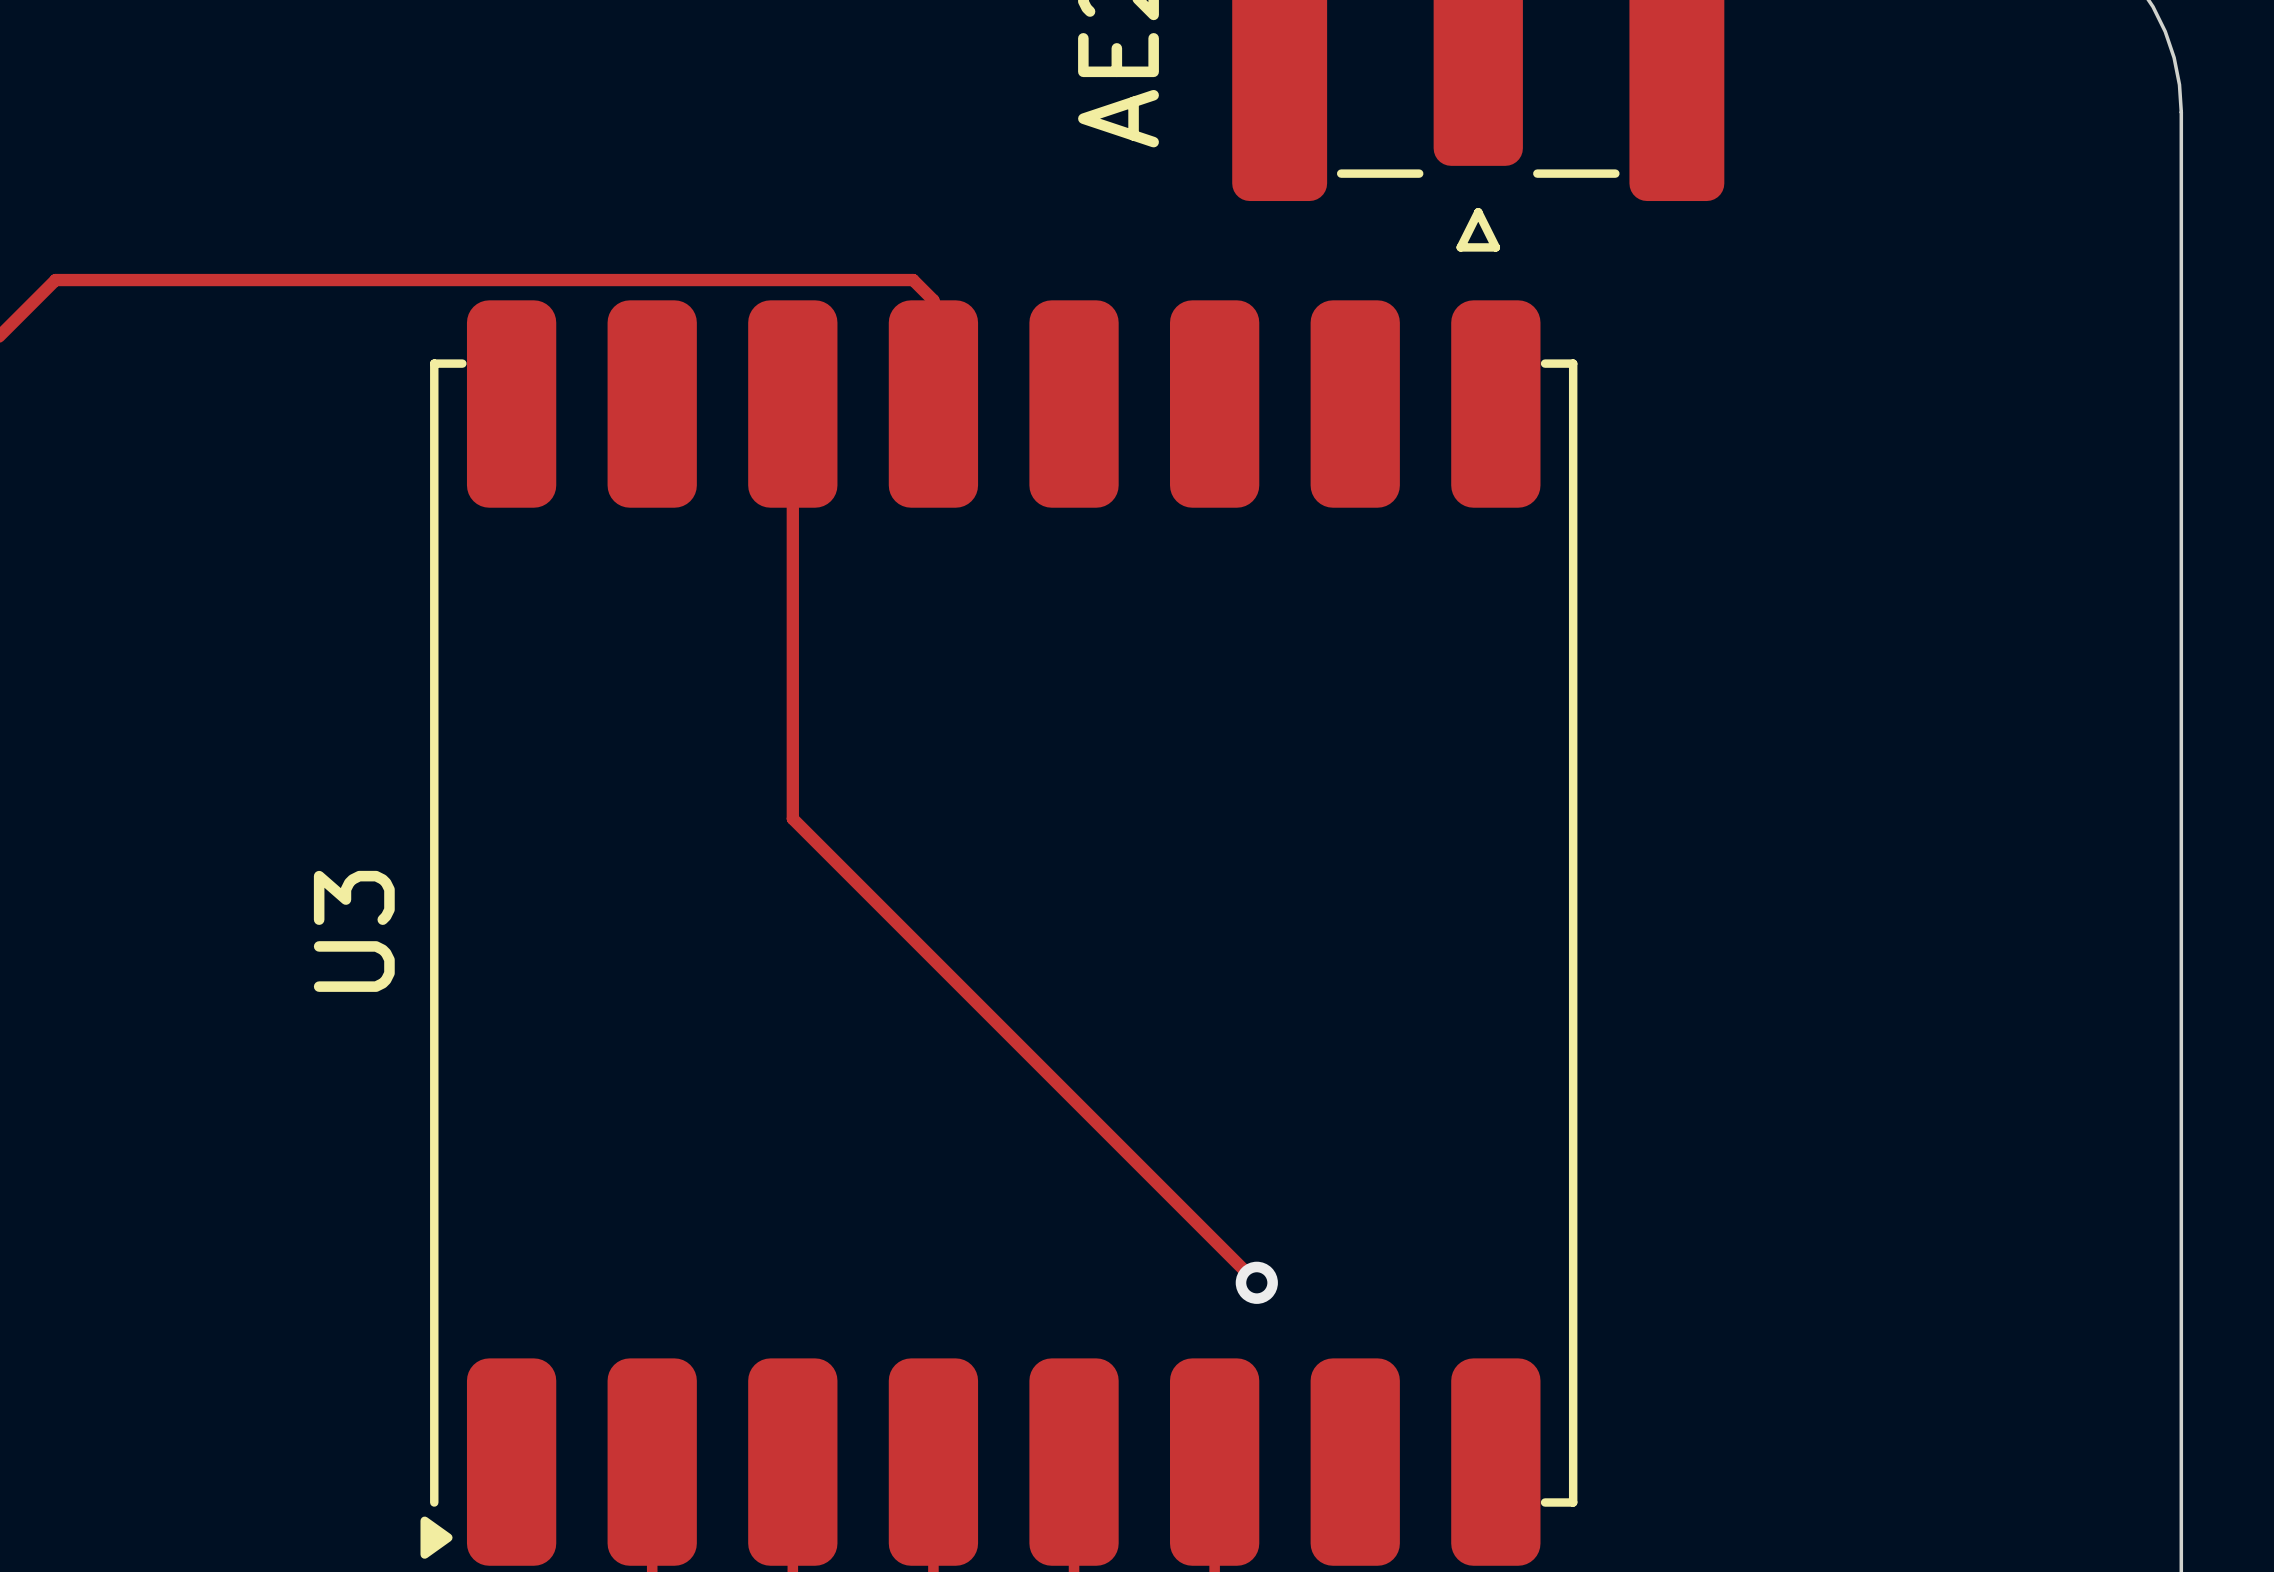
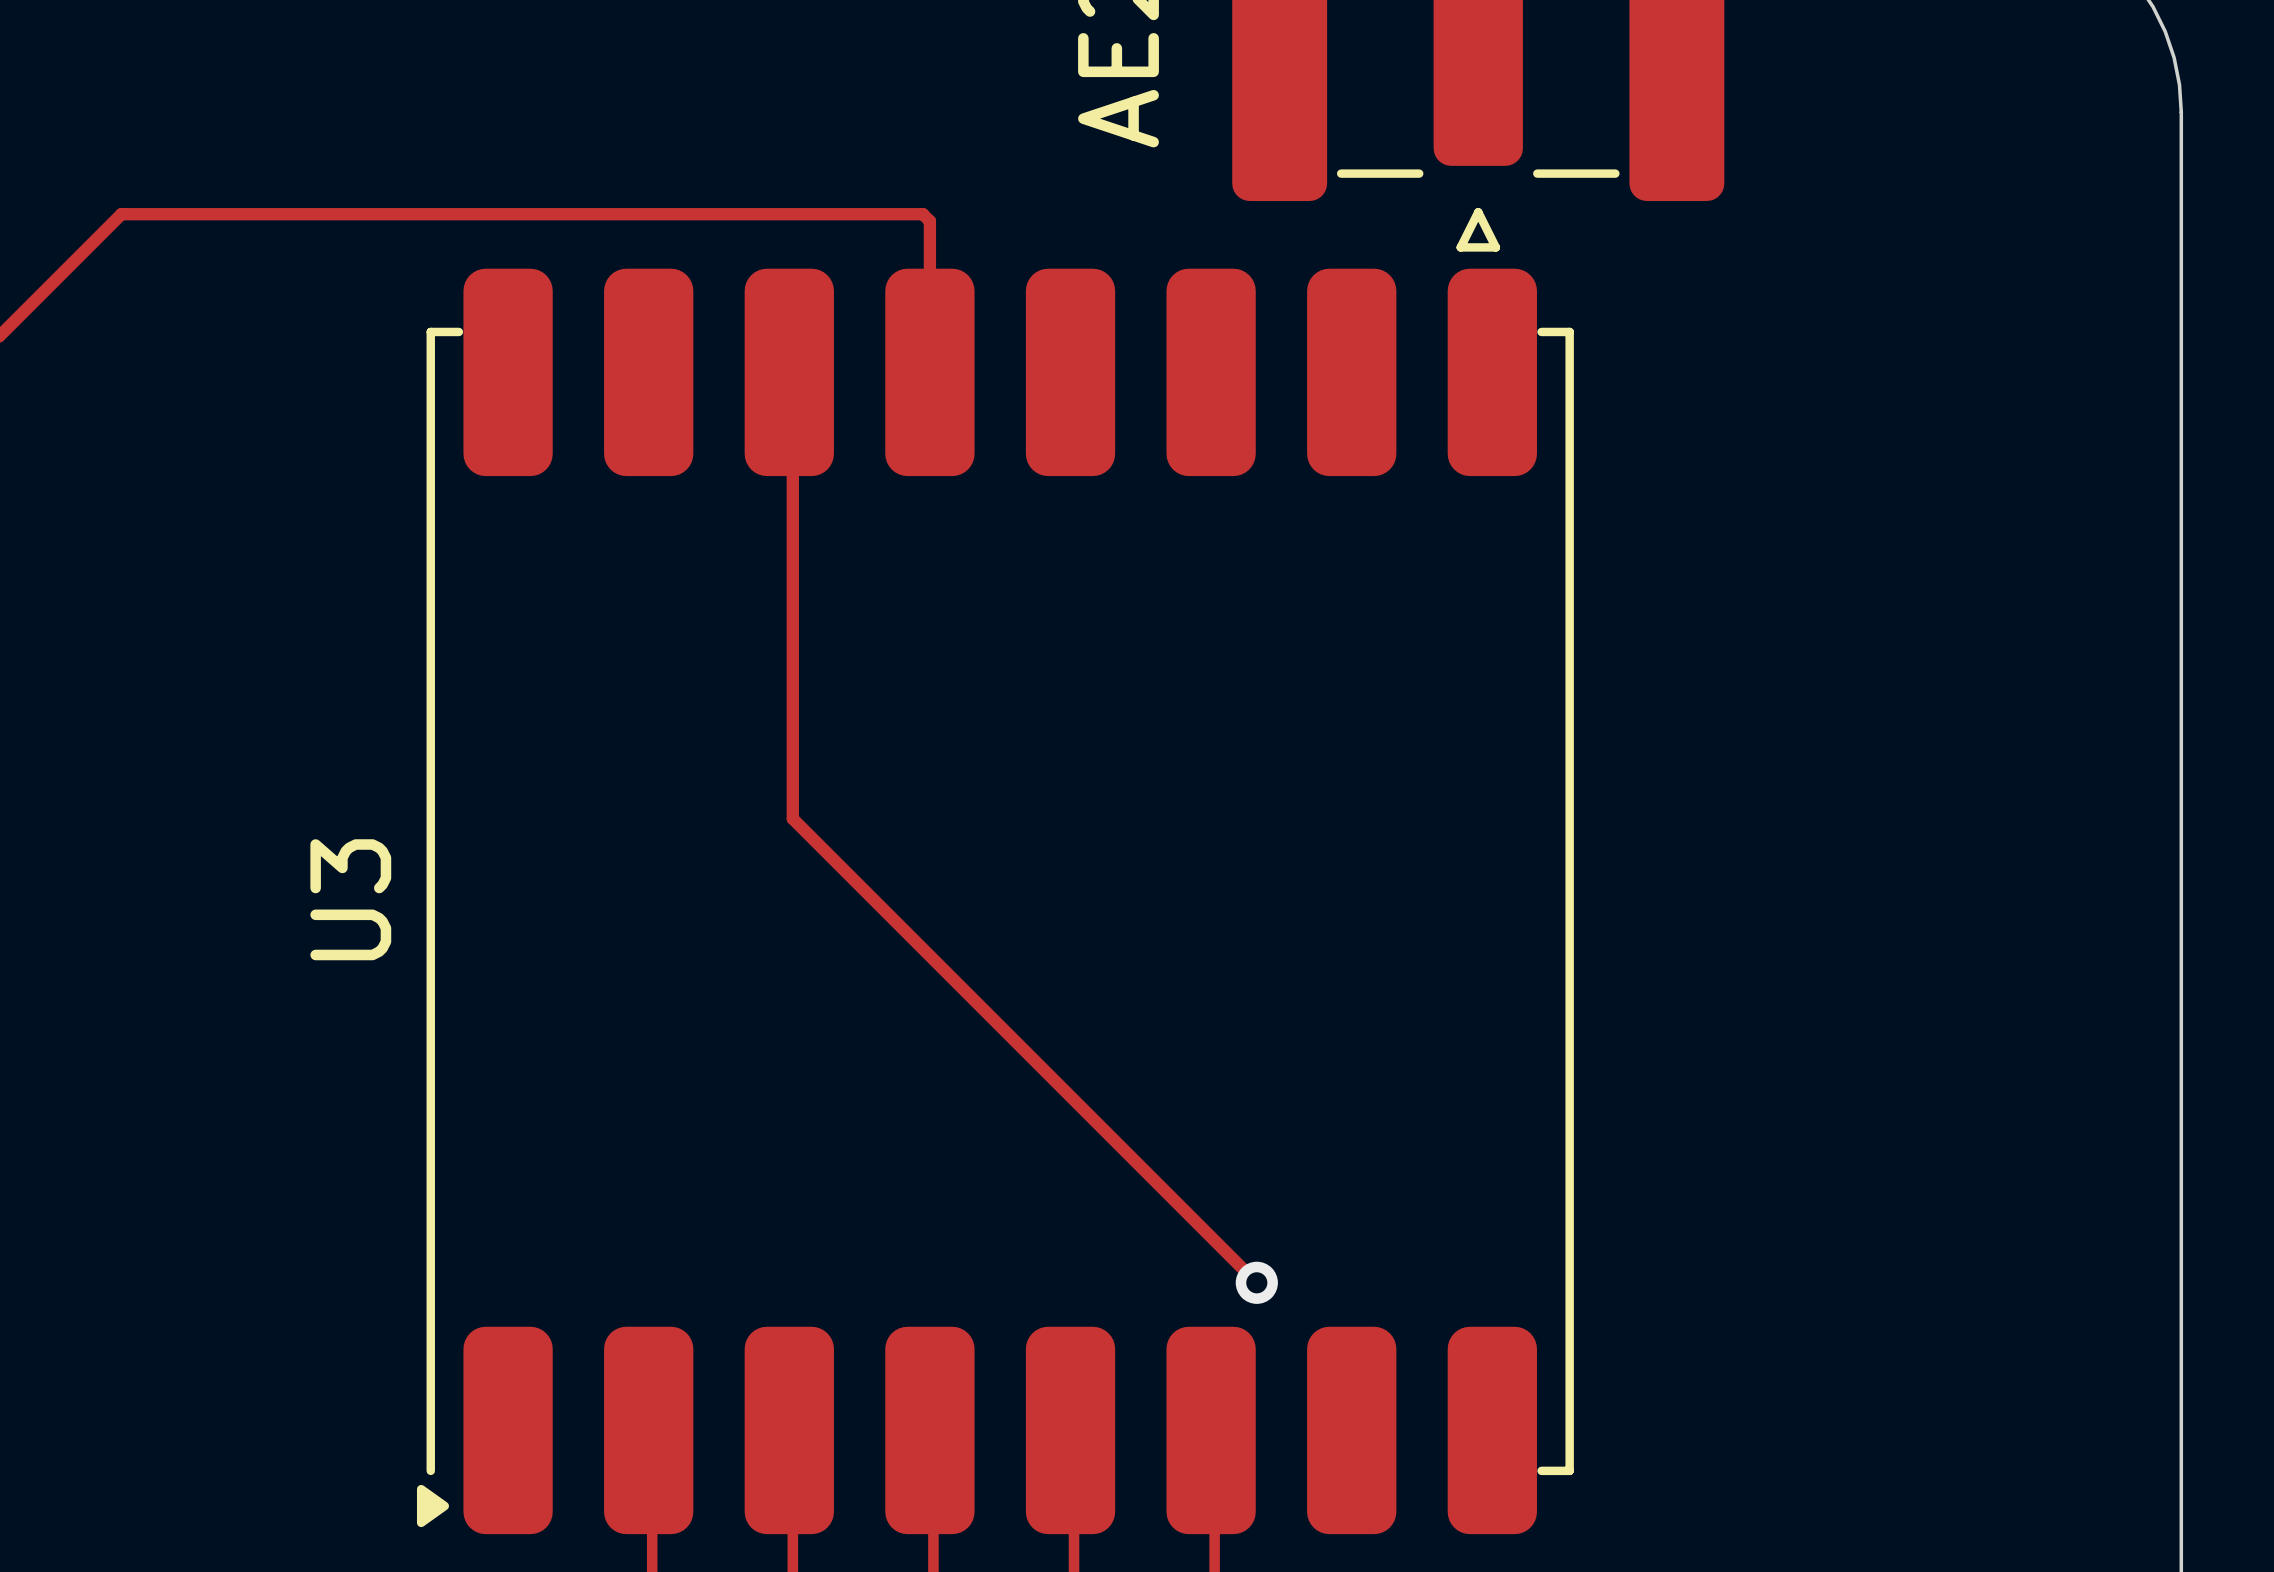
track: (55, 280) (913, 280) -> (55, 280) (121, 214) (922, 214) (929, 221) (929, 372)
U3 position: (998, 933) -> (995, 901)

